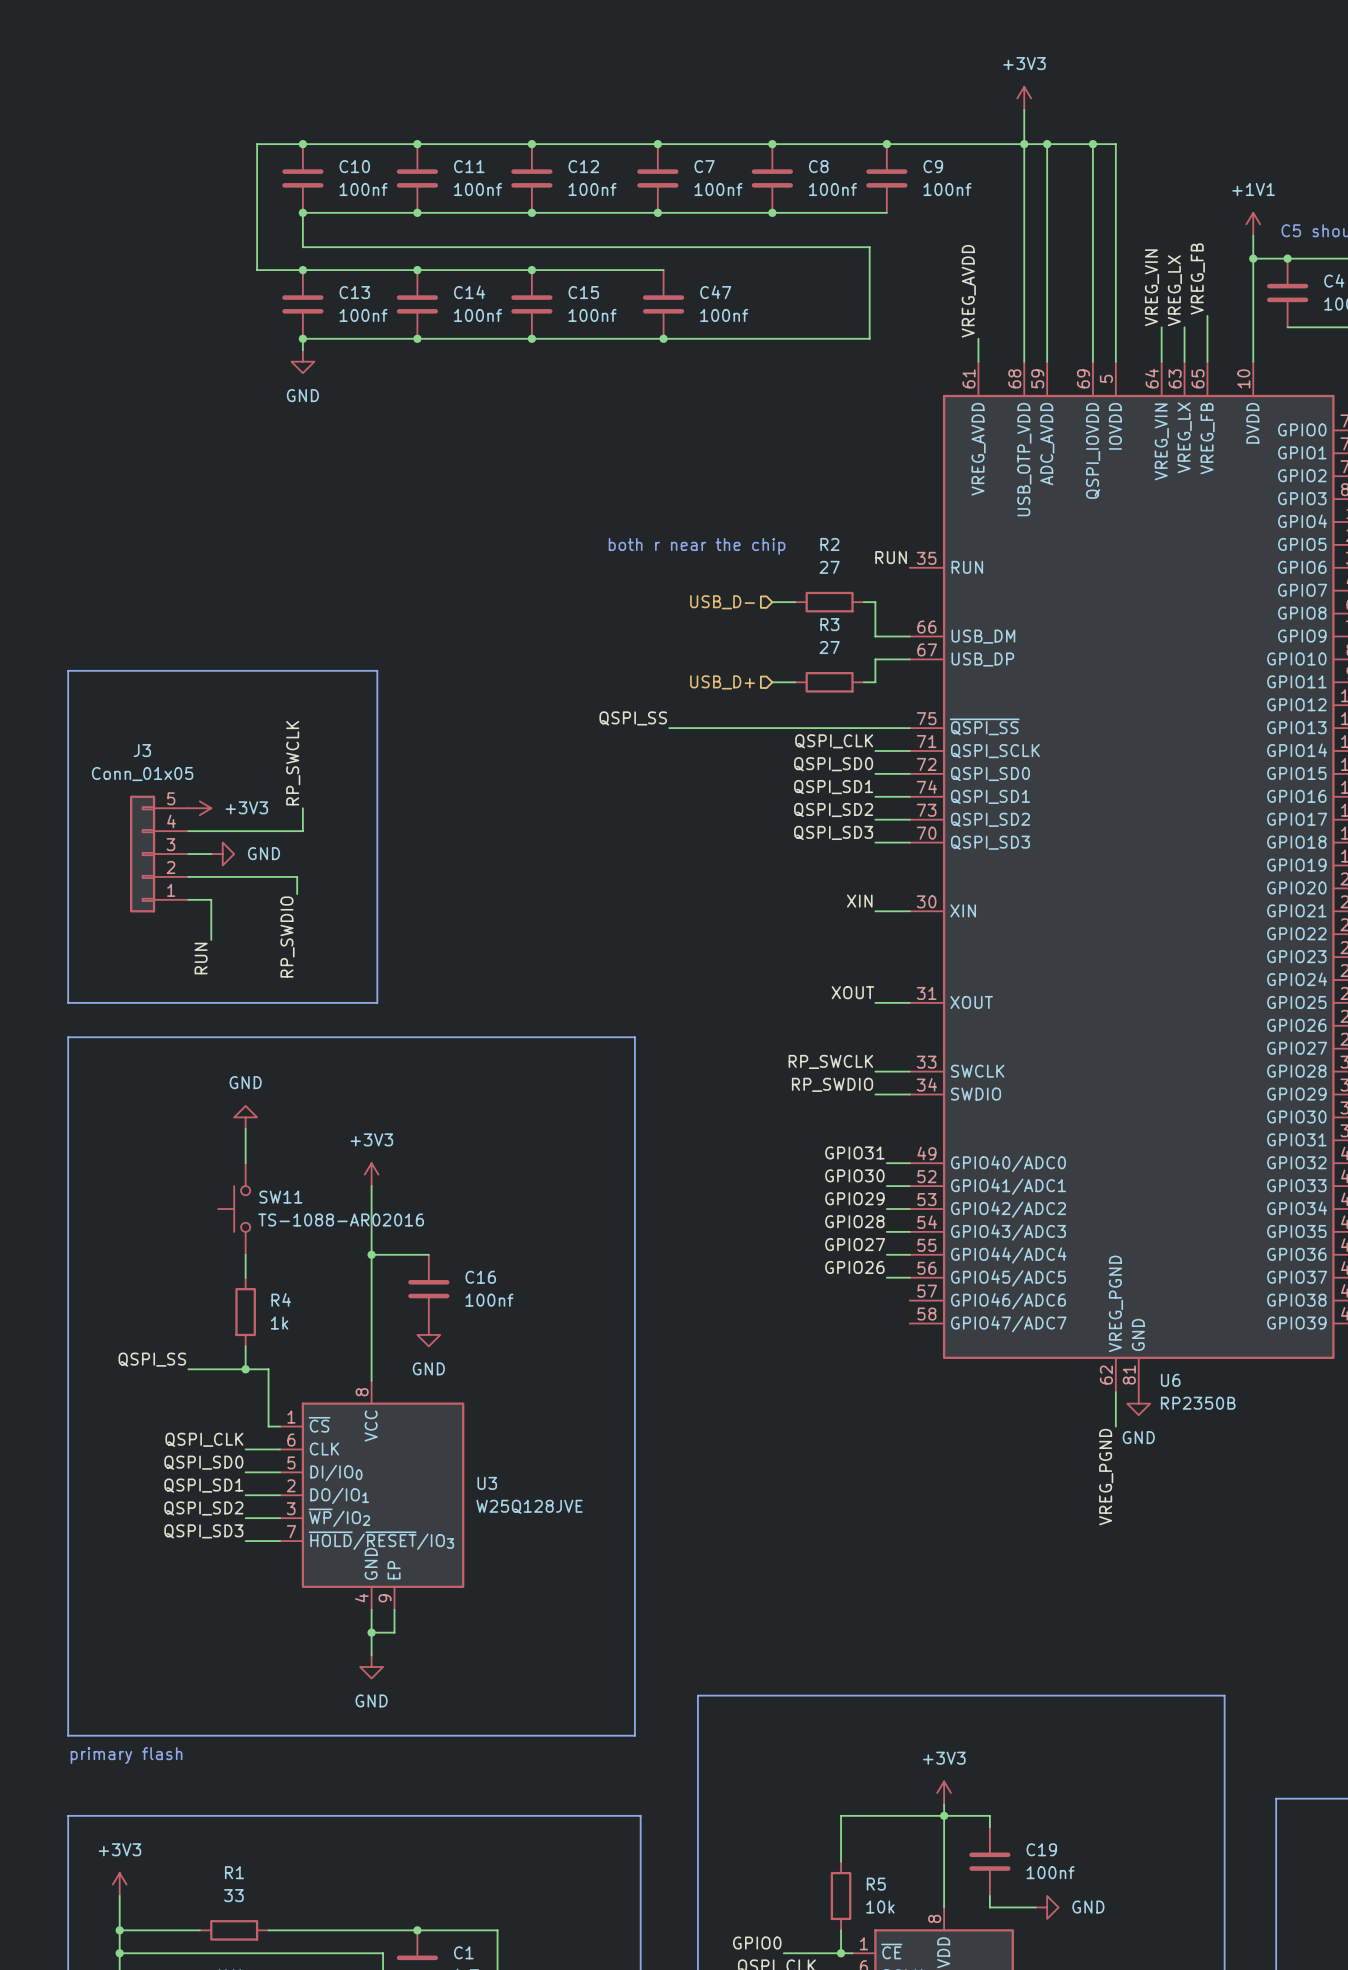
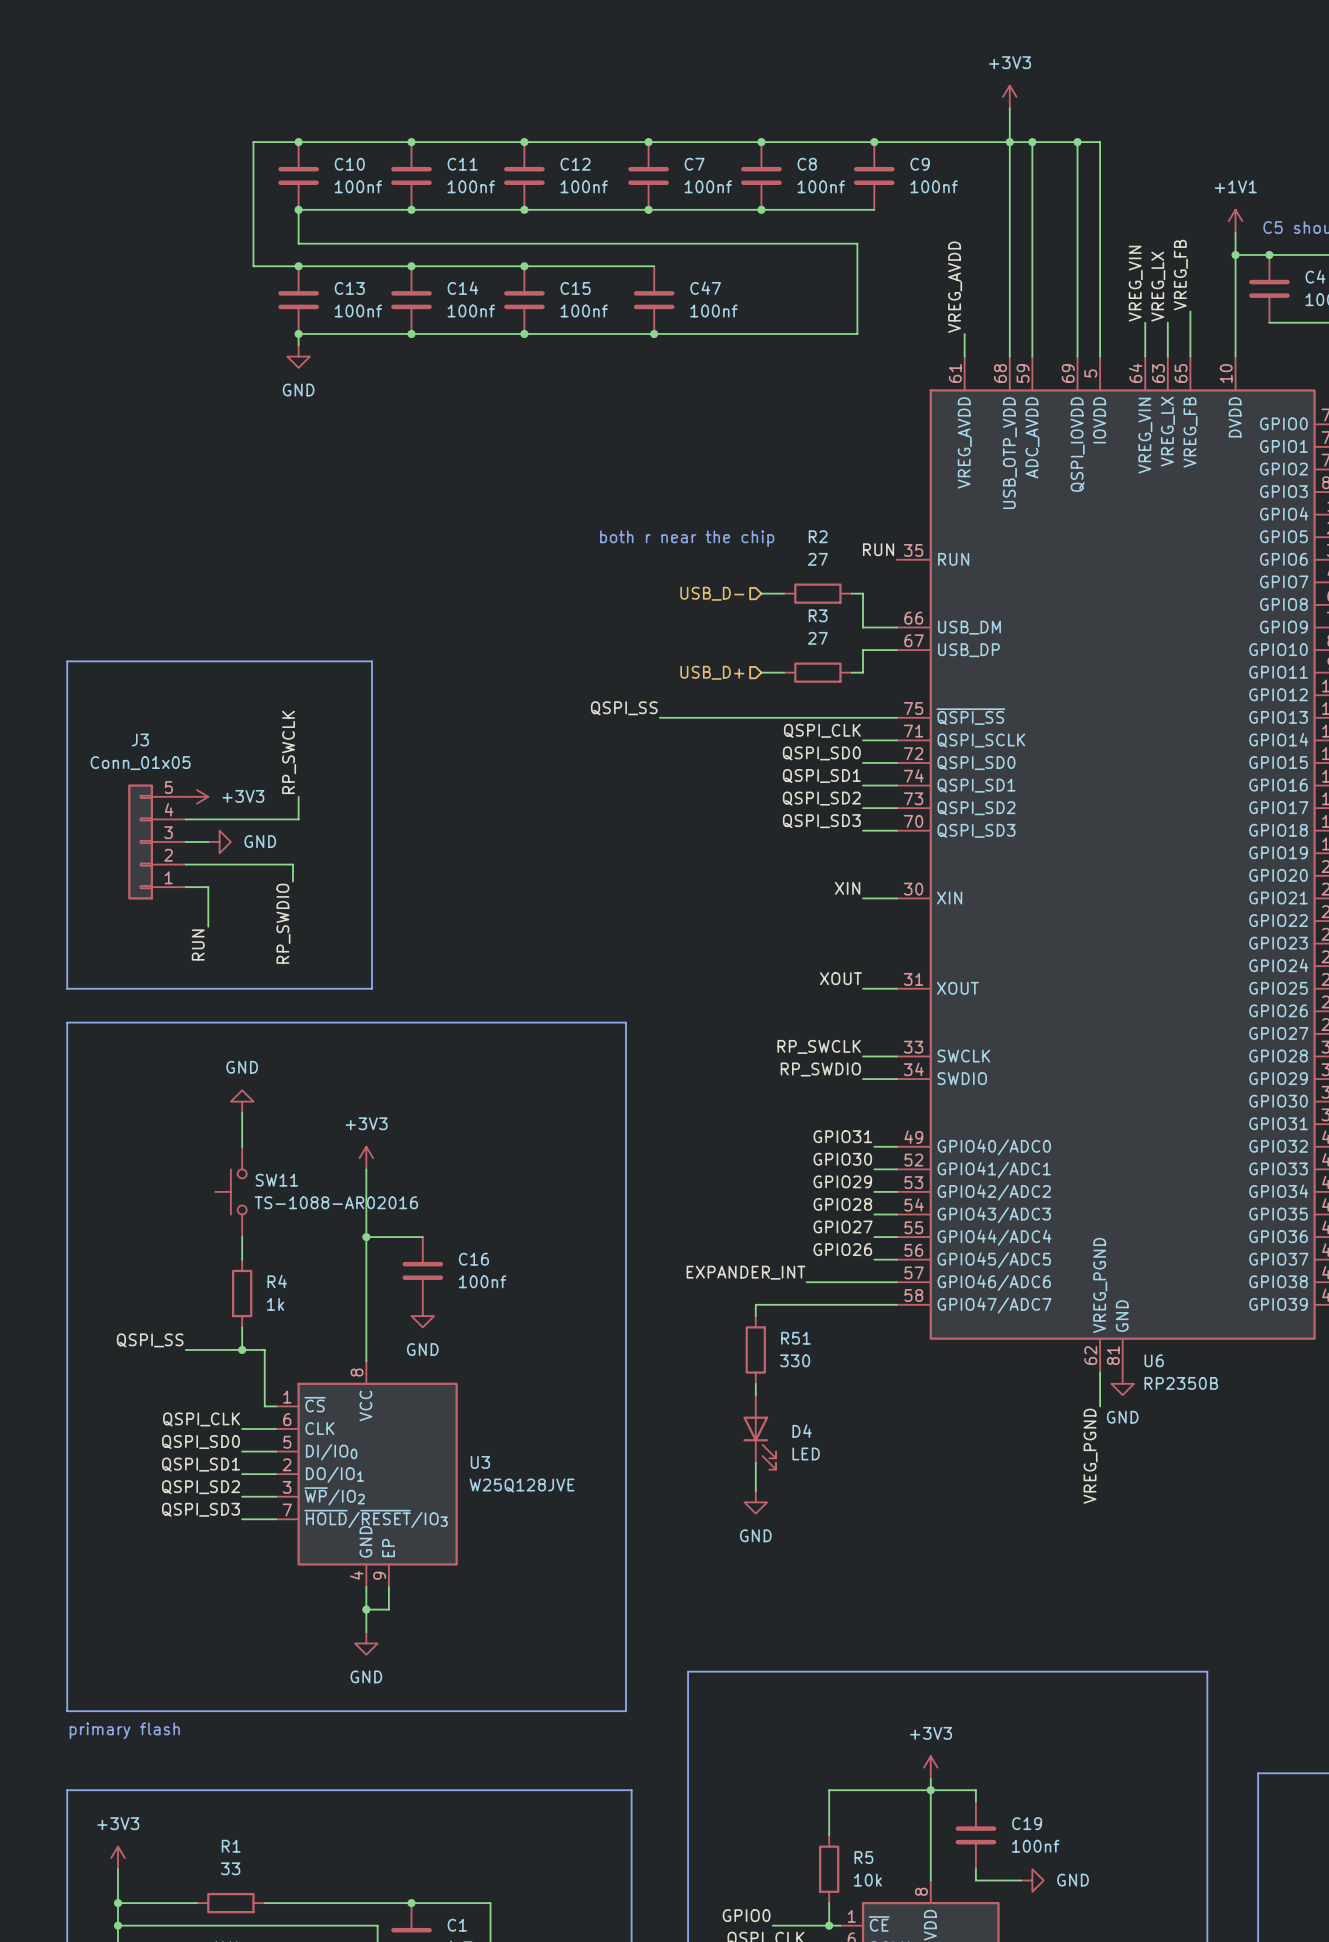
label: none -> EXPANDER_INT (746, 1272)
wire: none -> (806, 1282) (896, 1282)
wire: none -> (896, 1304) (755, 1304) (755, 1316)
R51: none -> 330 (755, 1349)
wire: none -> (755, 1383) (755, 1395)
D4: none -> LED (759, 1432)
wire: none -> (755, 1462) (755, 1491)
power symbol: none -> GND (755, 1502)

